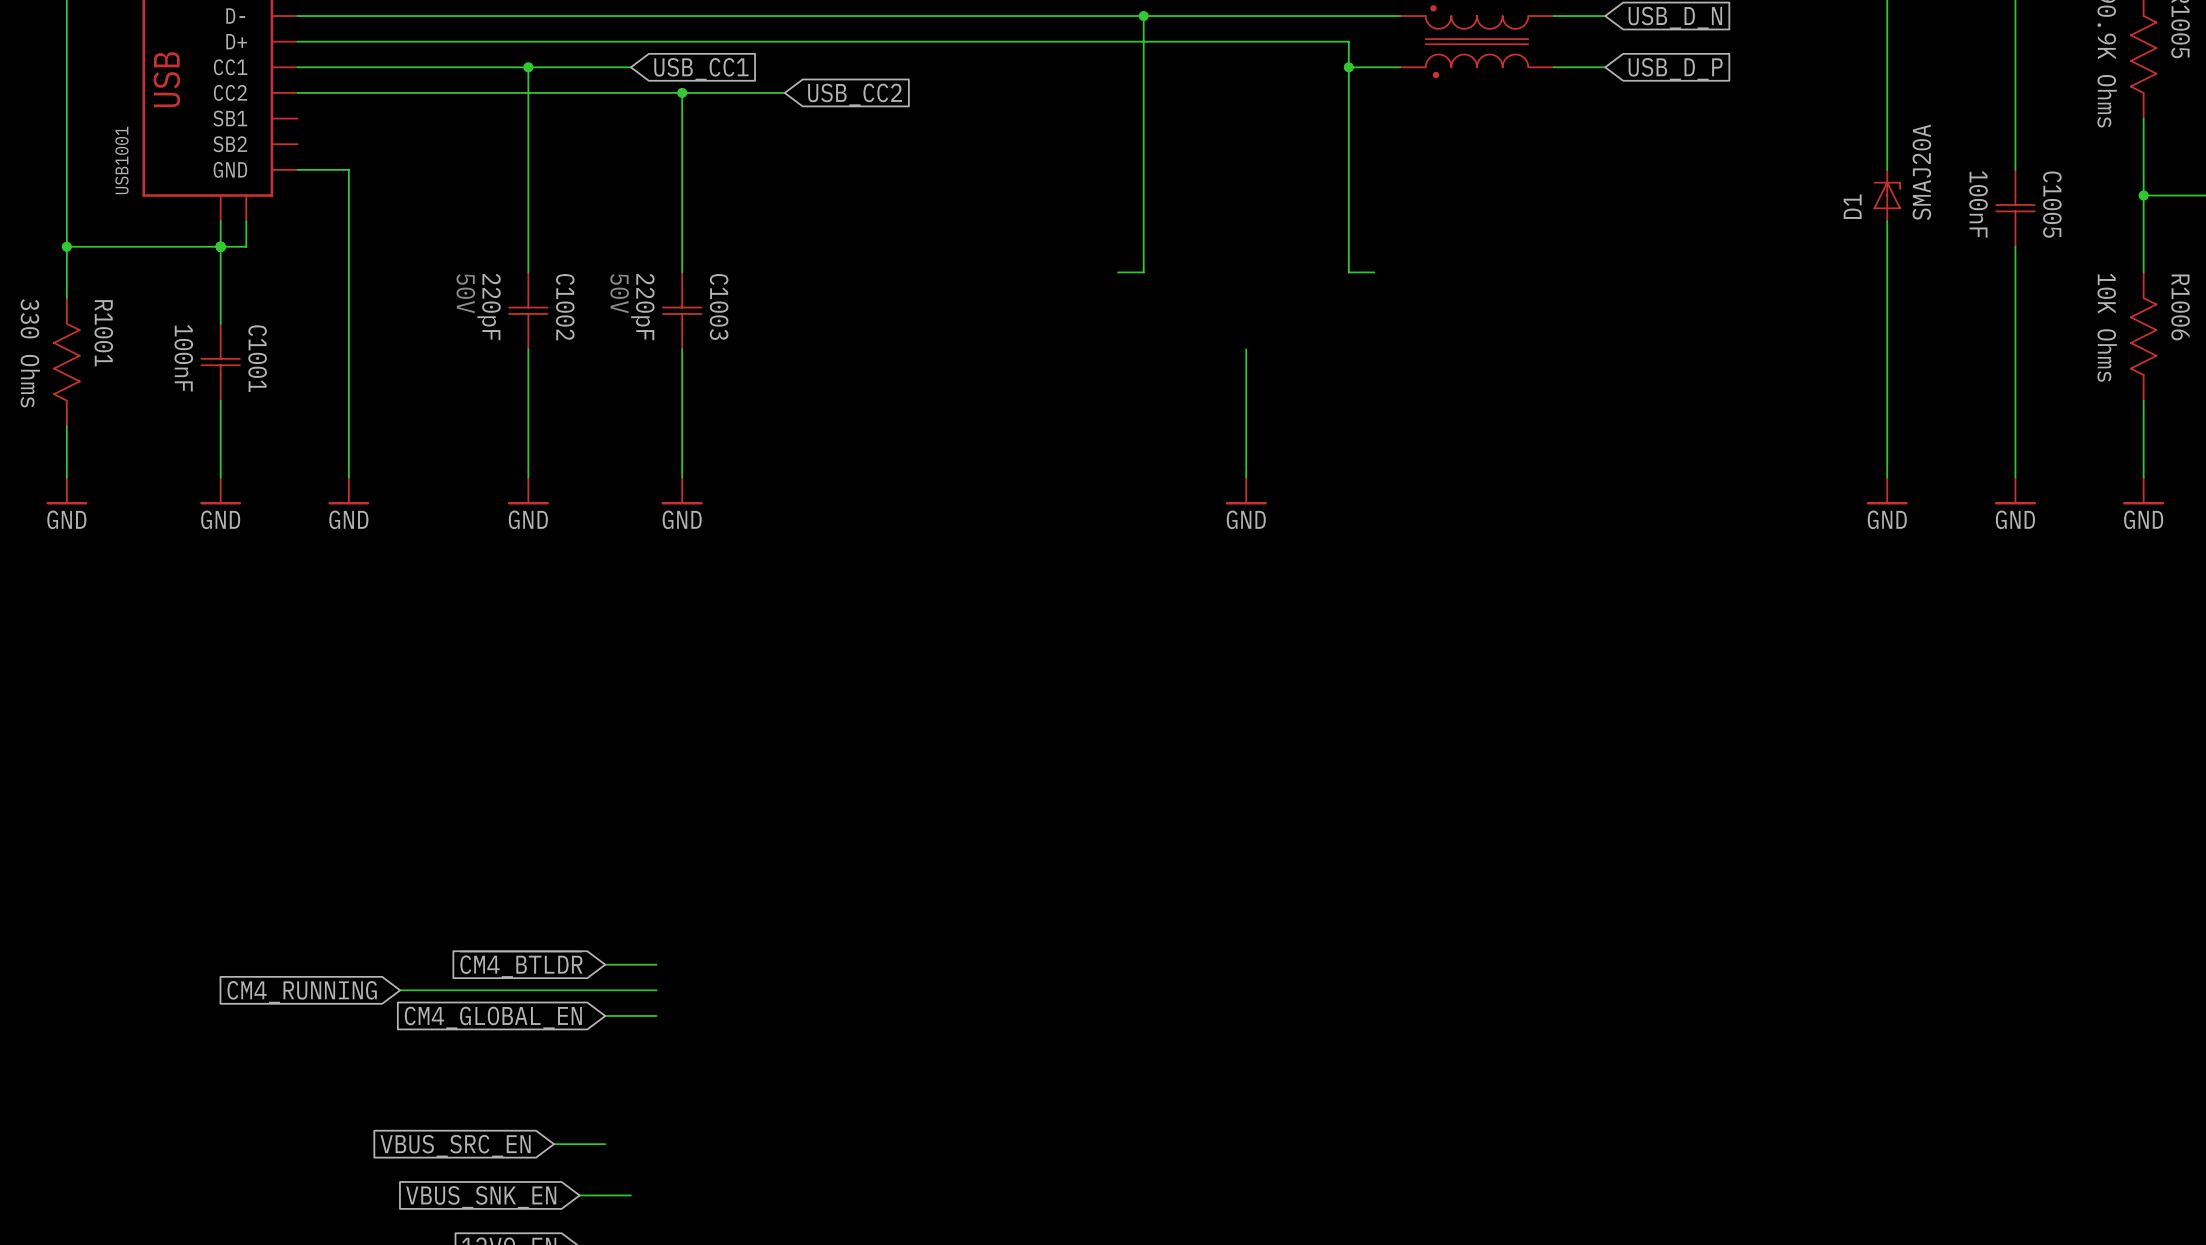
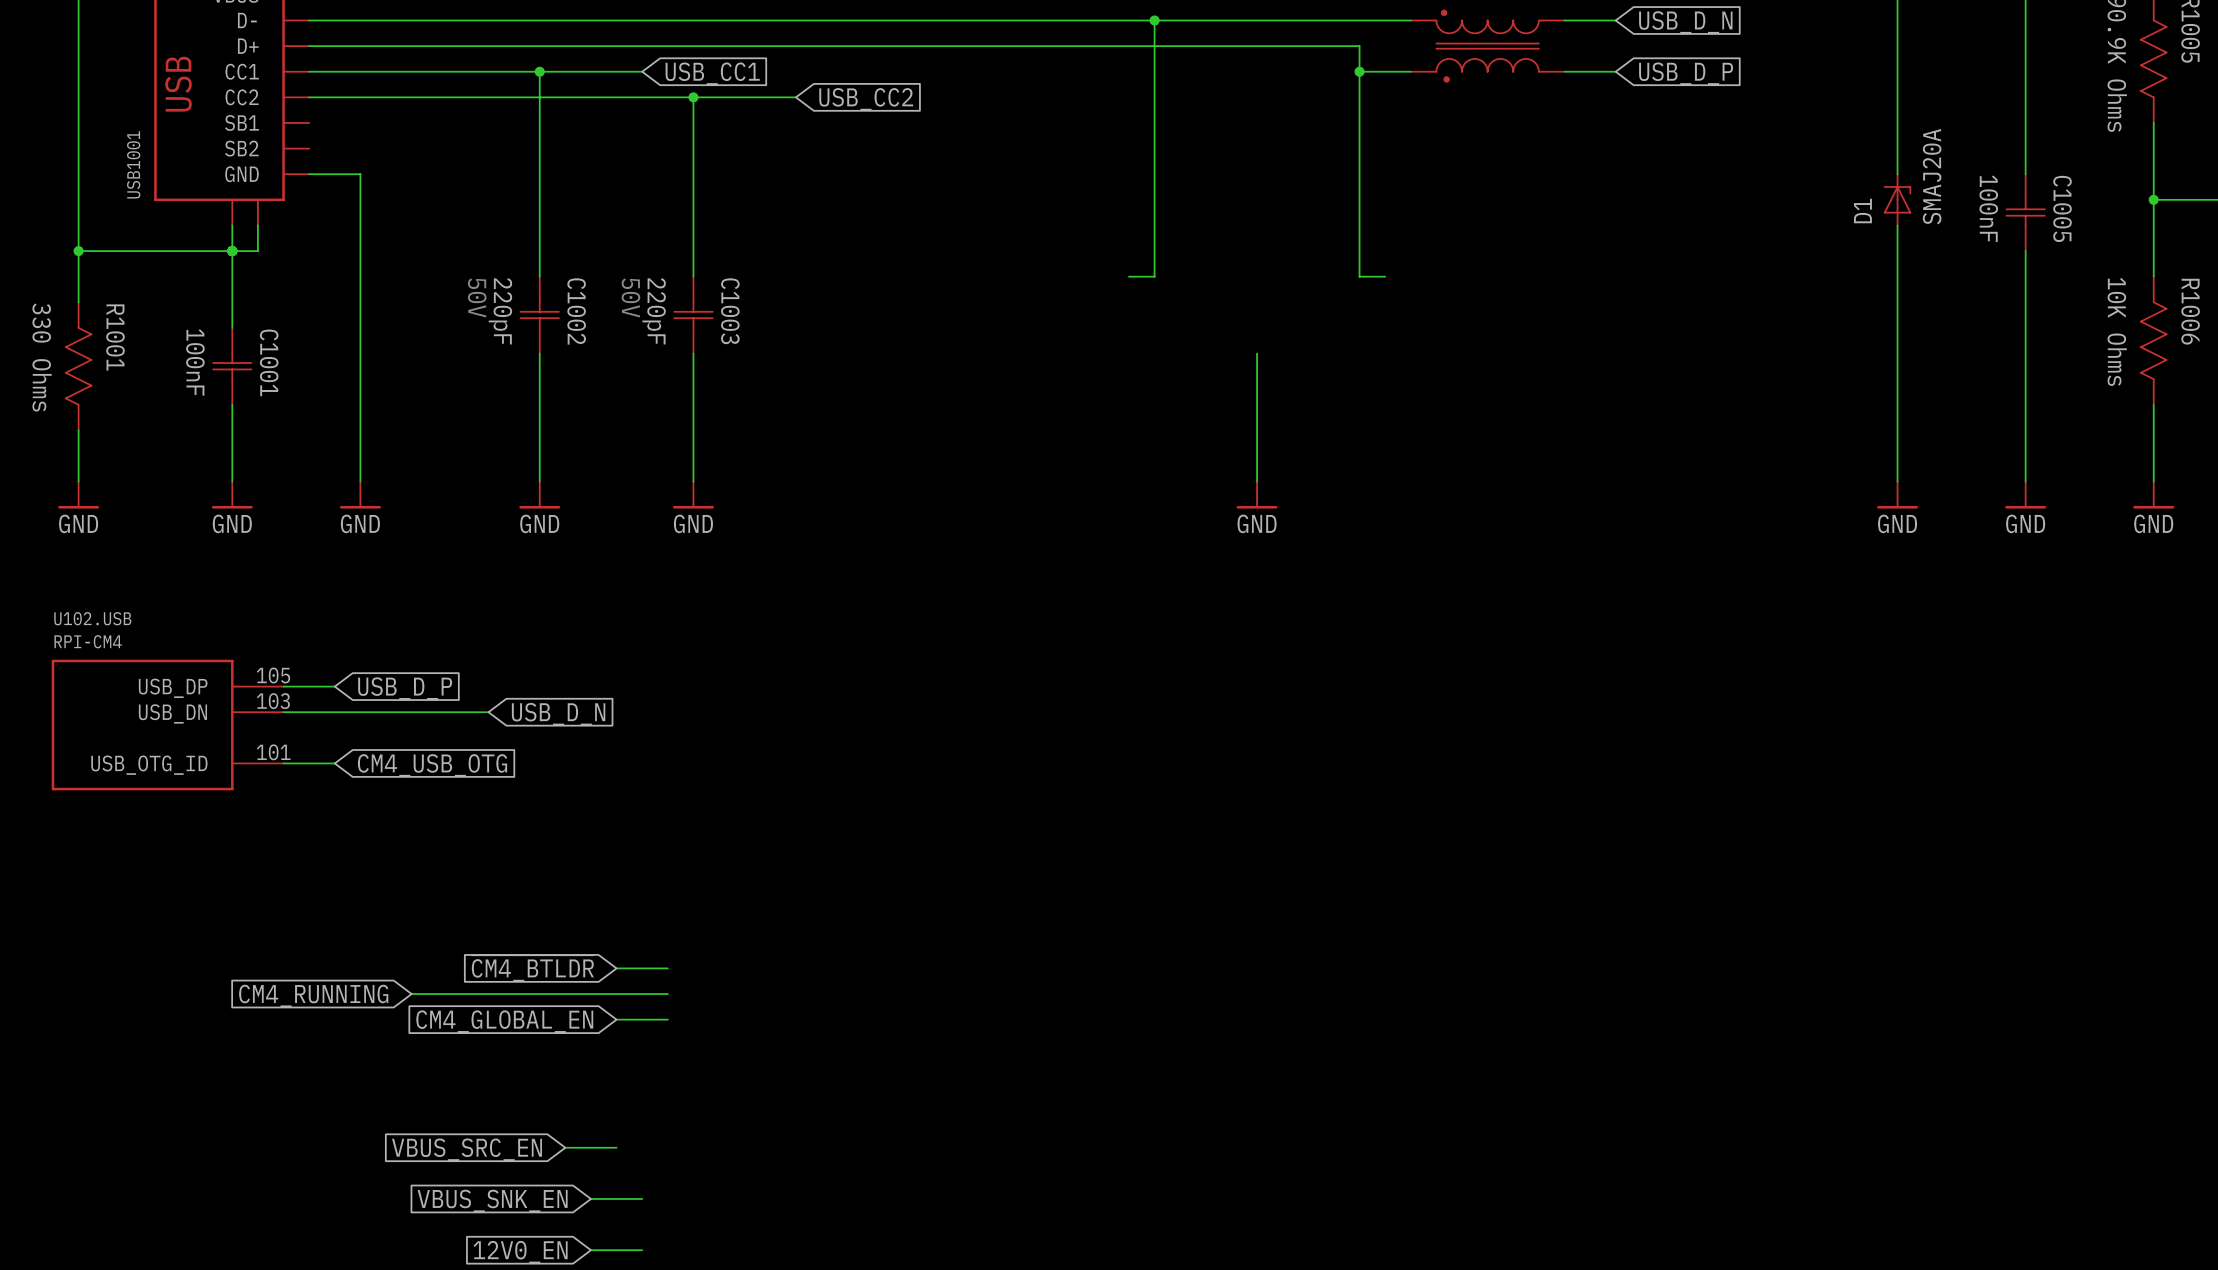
wire: none -> (283, 686) (334, 686)
global label: none -> USB_D_P (405, 688)
wire: none -> (283, 712) (488, 712)
global label: none -> USB_D_N (558, 714)
U102.USB: none -> RPI-CM4 (167, 725)
wire: none -> (283, 763) (334, 763)
global label: none -> CM4_USB_OTG (432, 765)

